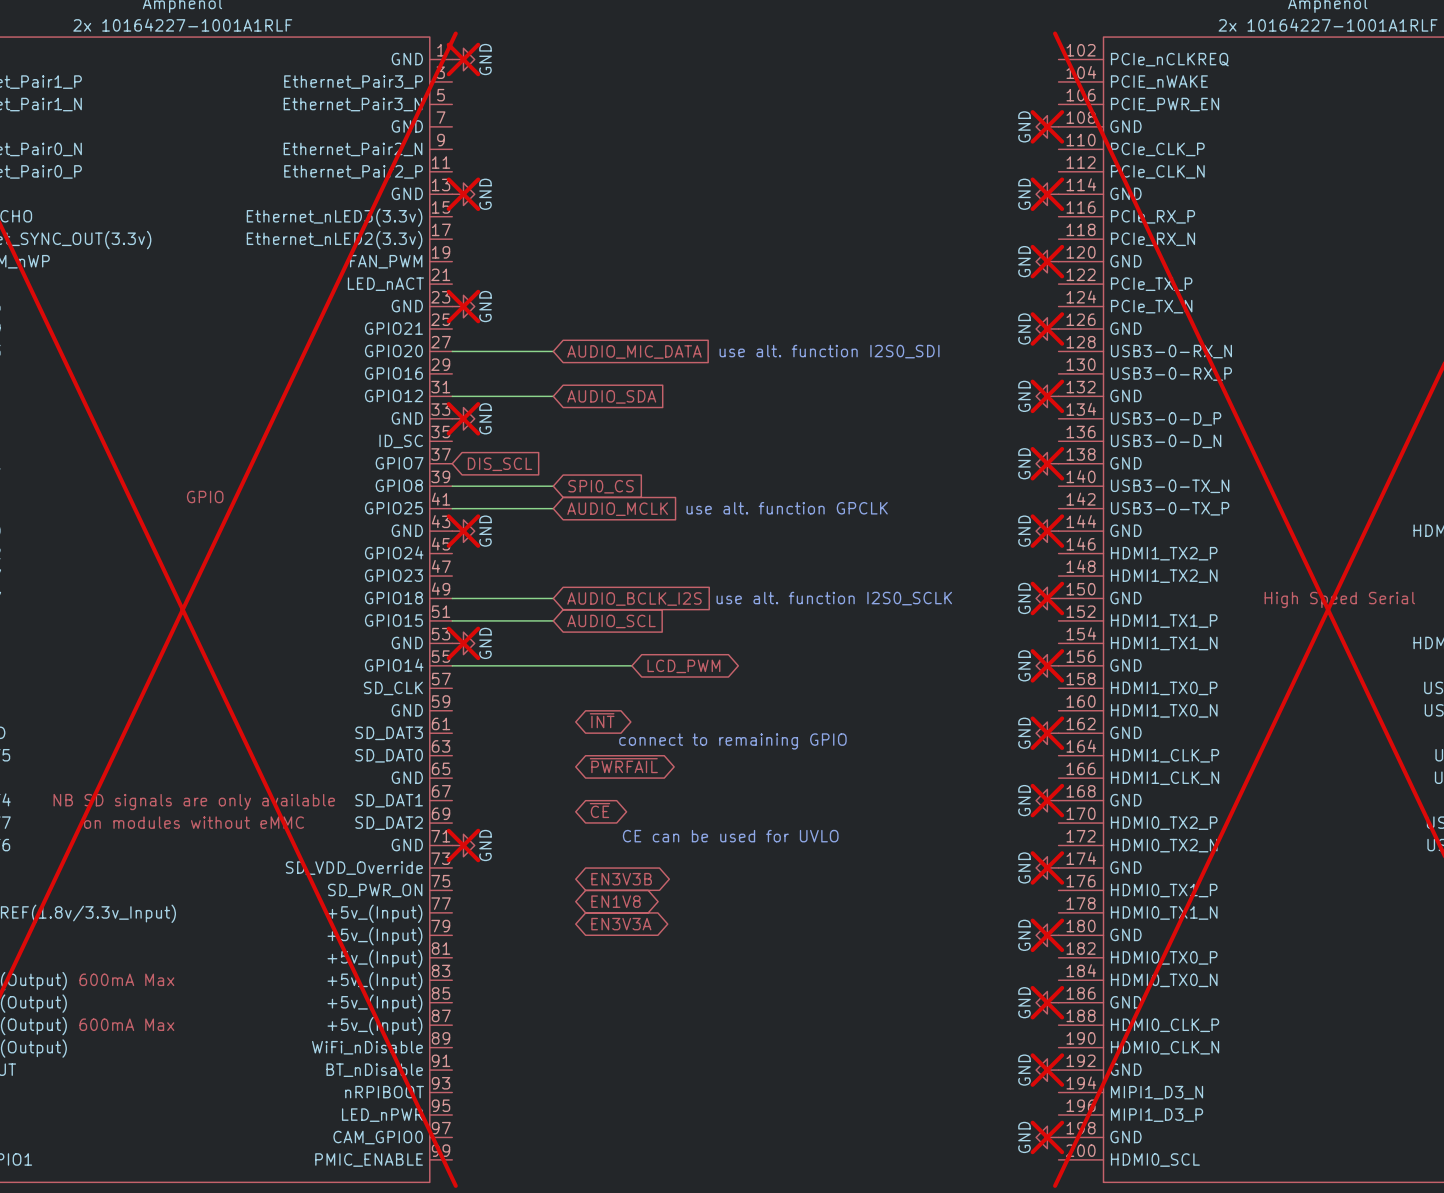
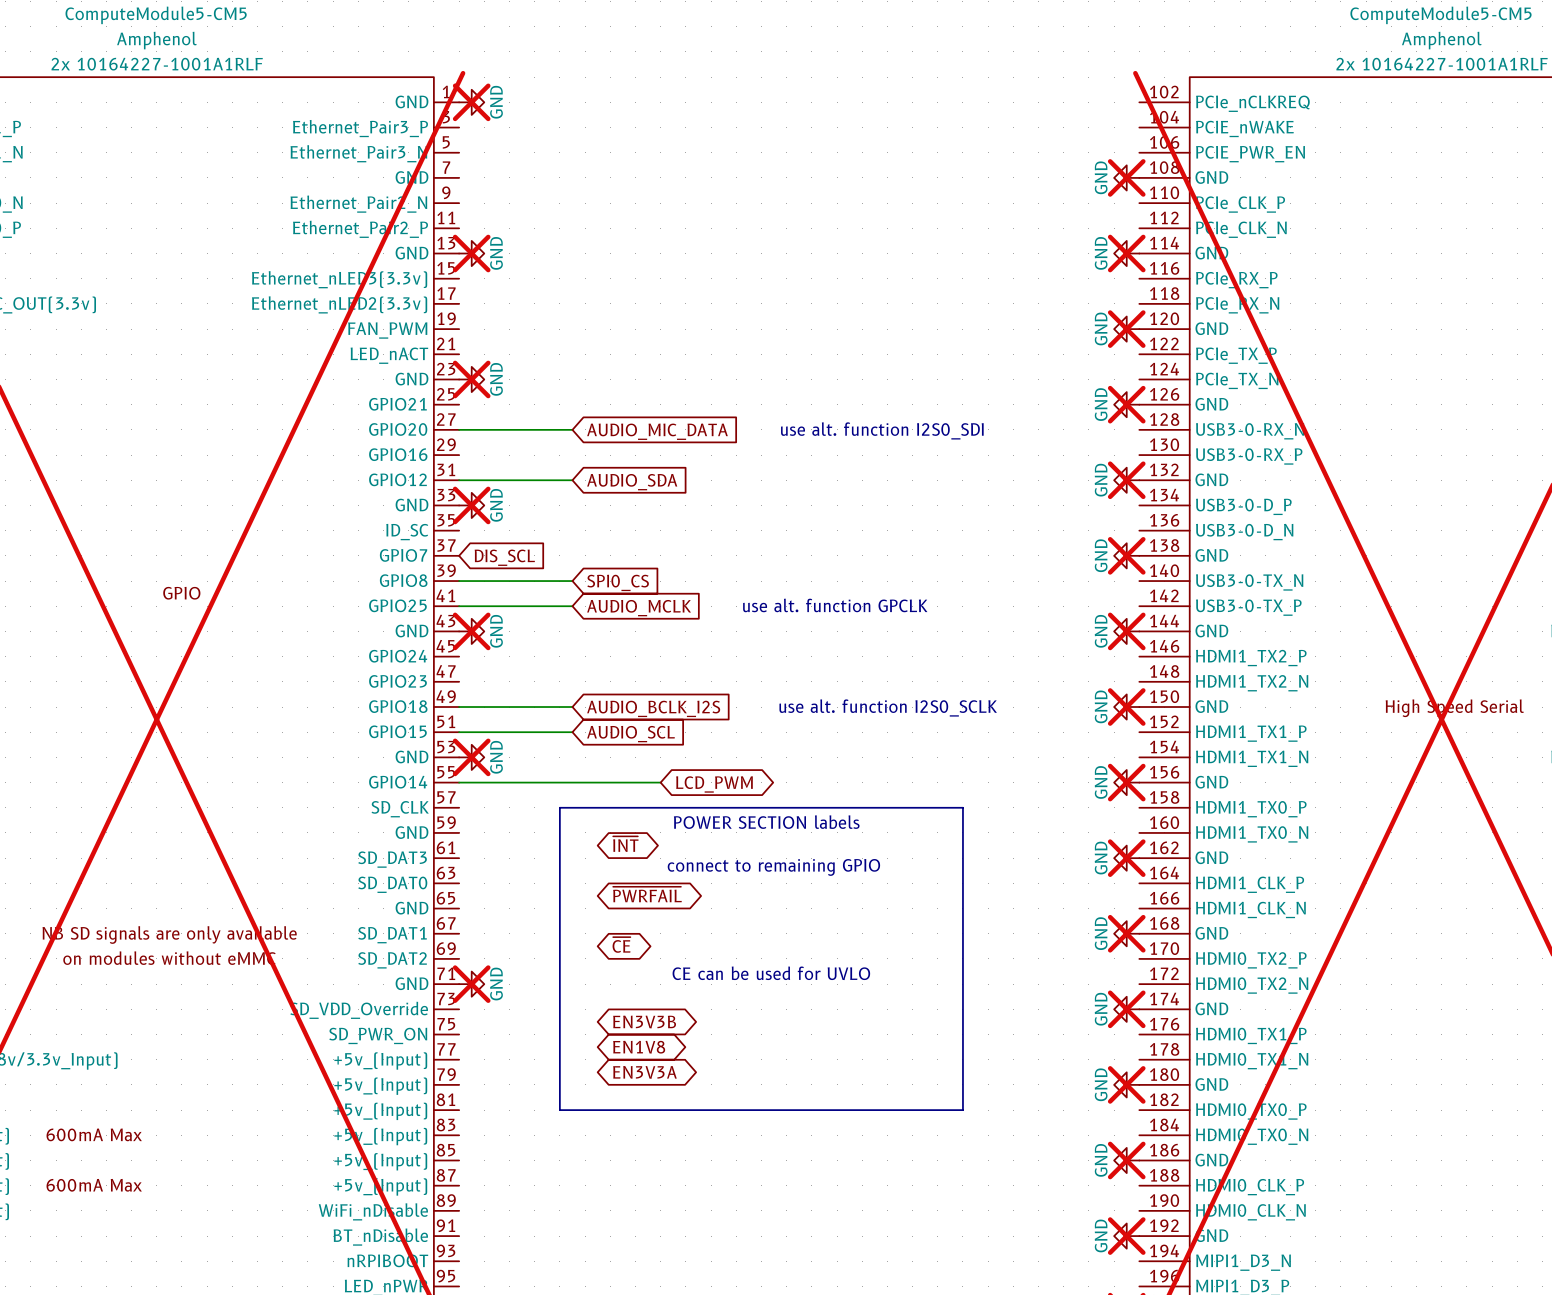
line: none -> (559, 807) (962, 807) (962, 1110) (559, 1110) (559, 807)
text: none -> POWER SECTION labels (766, 822)

